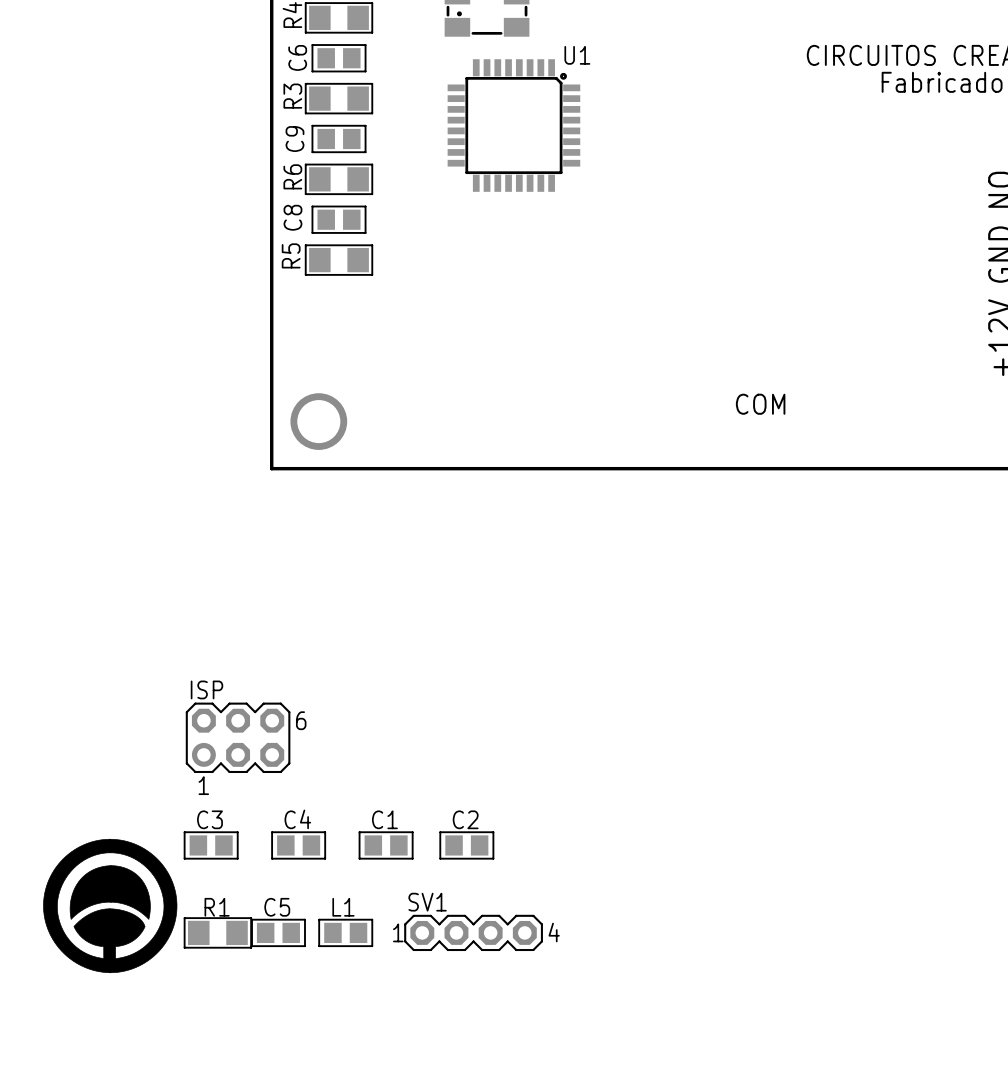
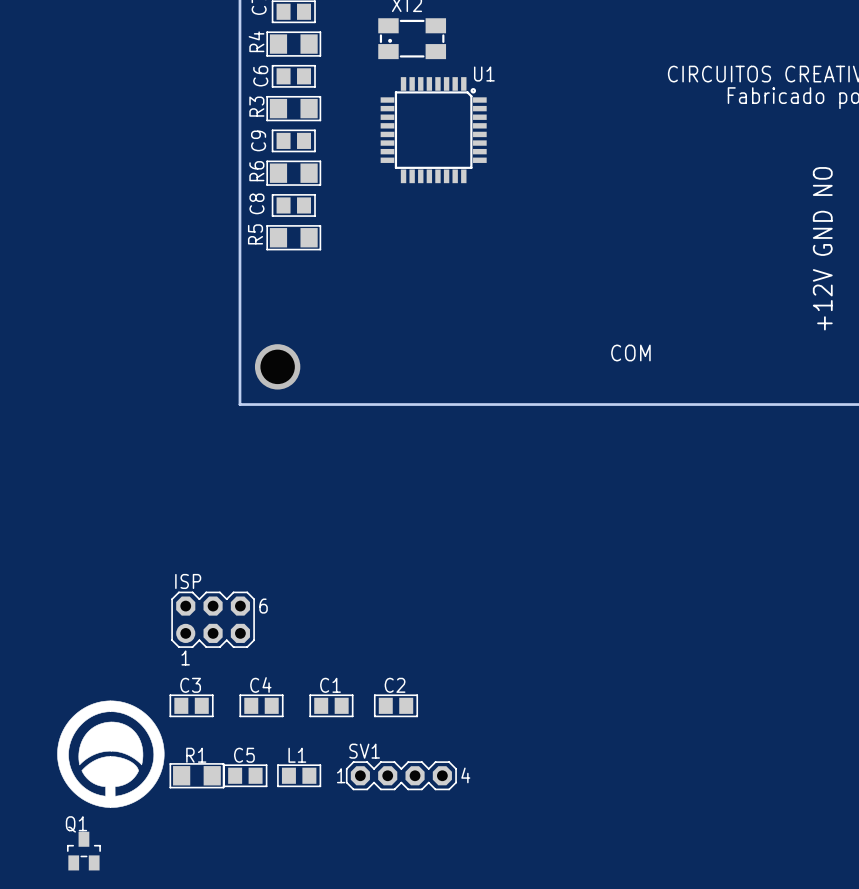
Q1: none -> (83, 851)

